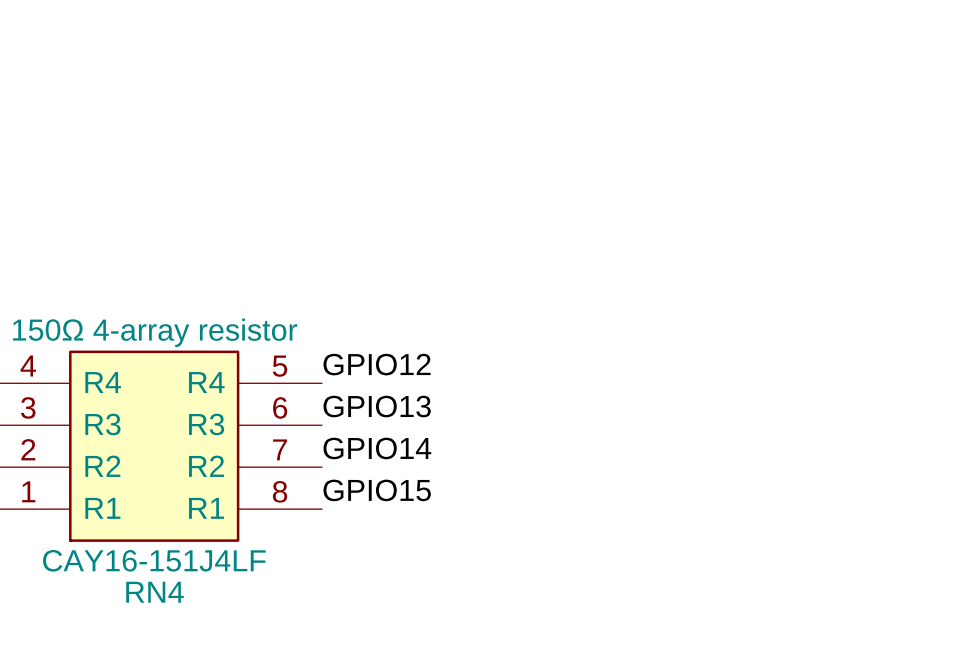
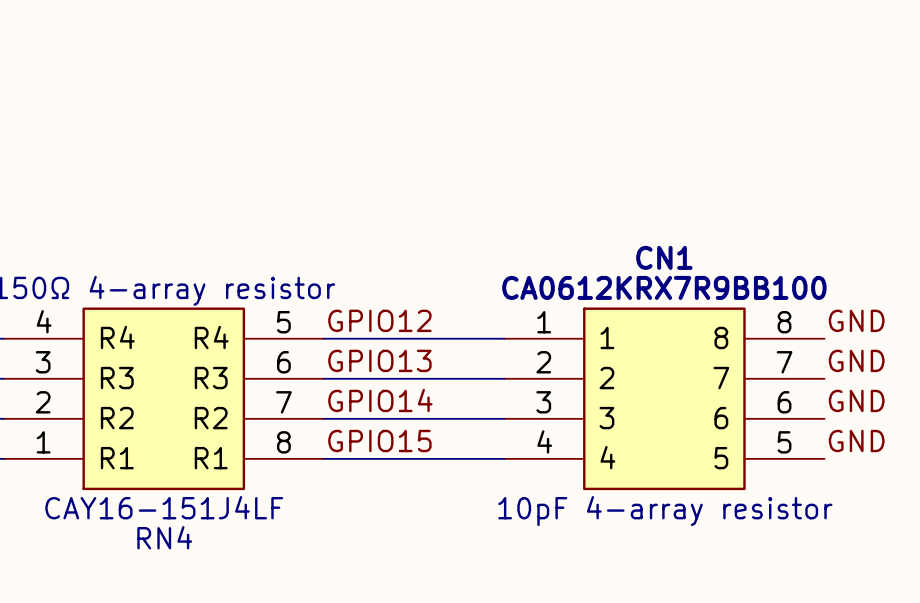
label: none -> GND (856, 320)
wire: none -> (323, 338) (504, 338)
label: none -> GND (856, 360)
wire: none -> (323, 378) (504, 378)
CN1: none -> CA0612KRX7R9BB100 (664, 398)
label: none -> GND (856, 400)
wire: none -> (323, 418) (504, 418)
label: none -> GND (856, 441)
wire: none -> (323, 458) (504, 458)

